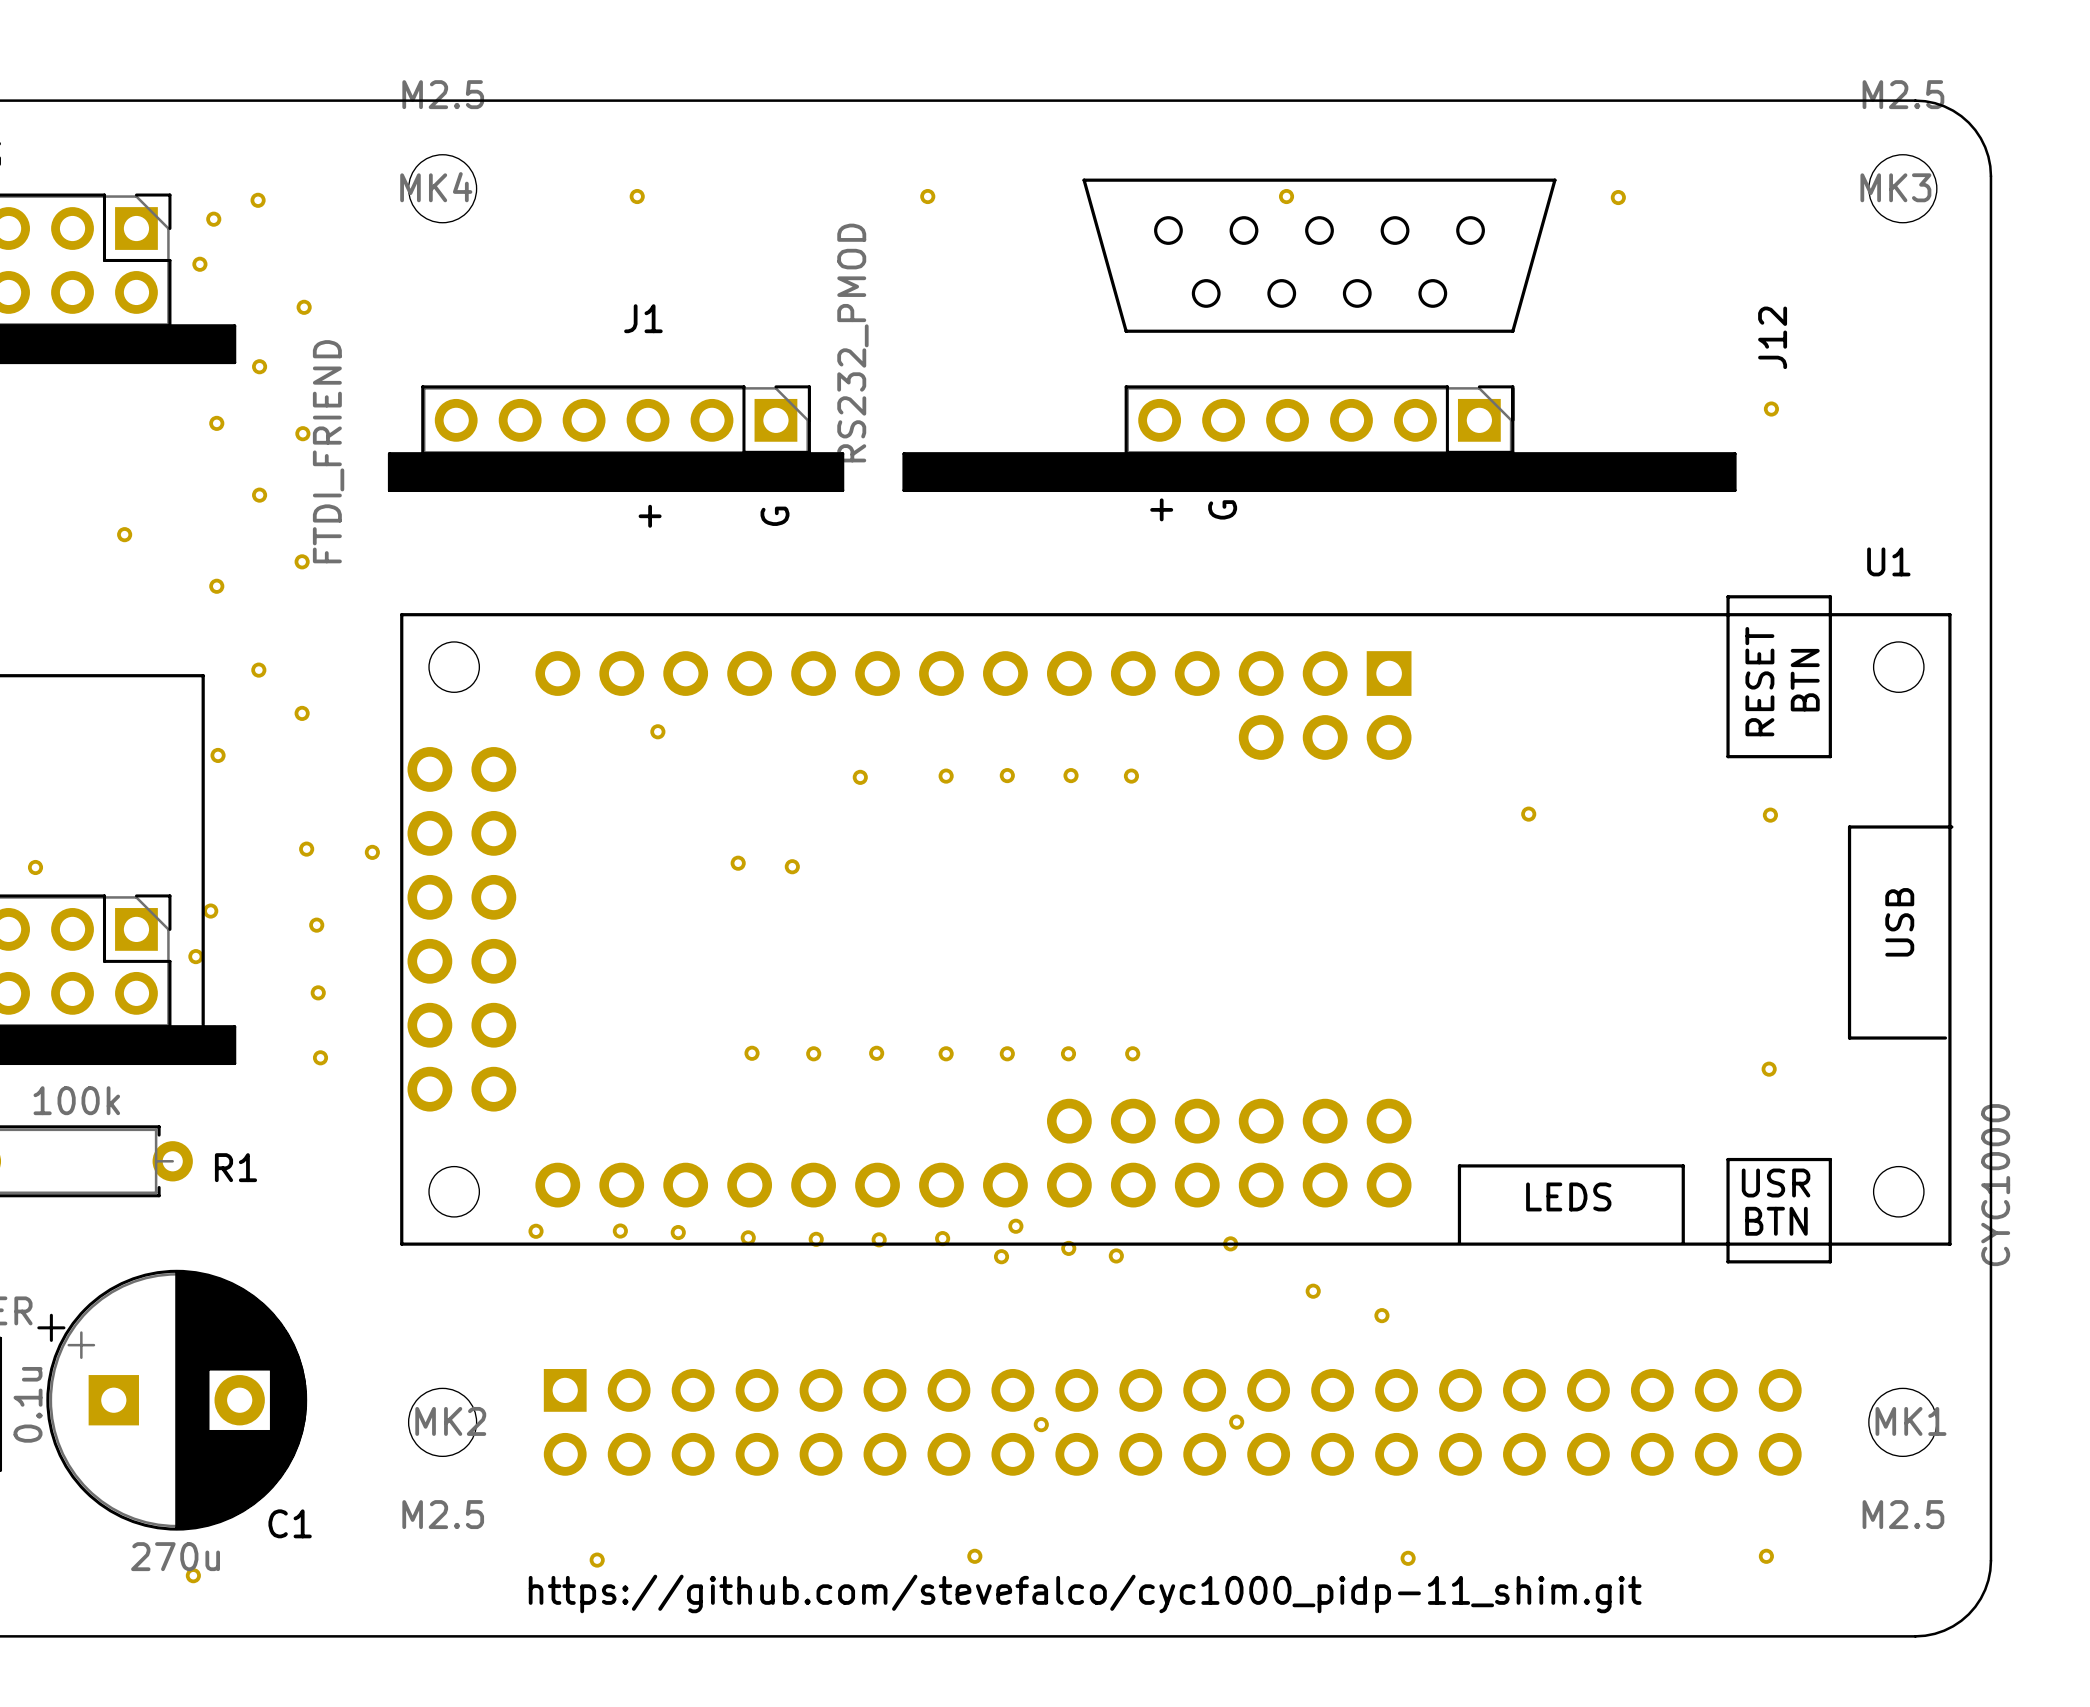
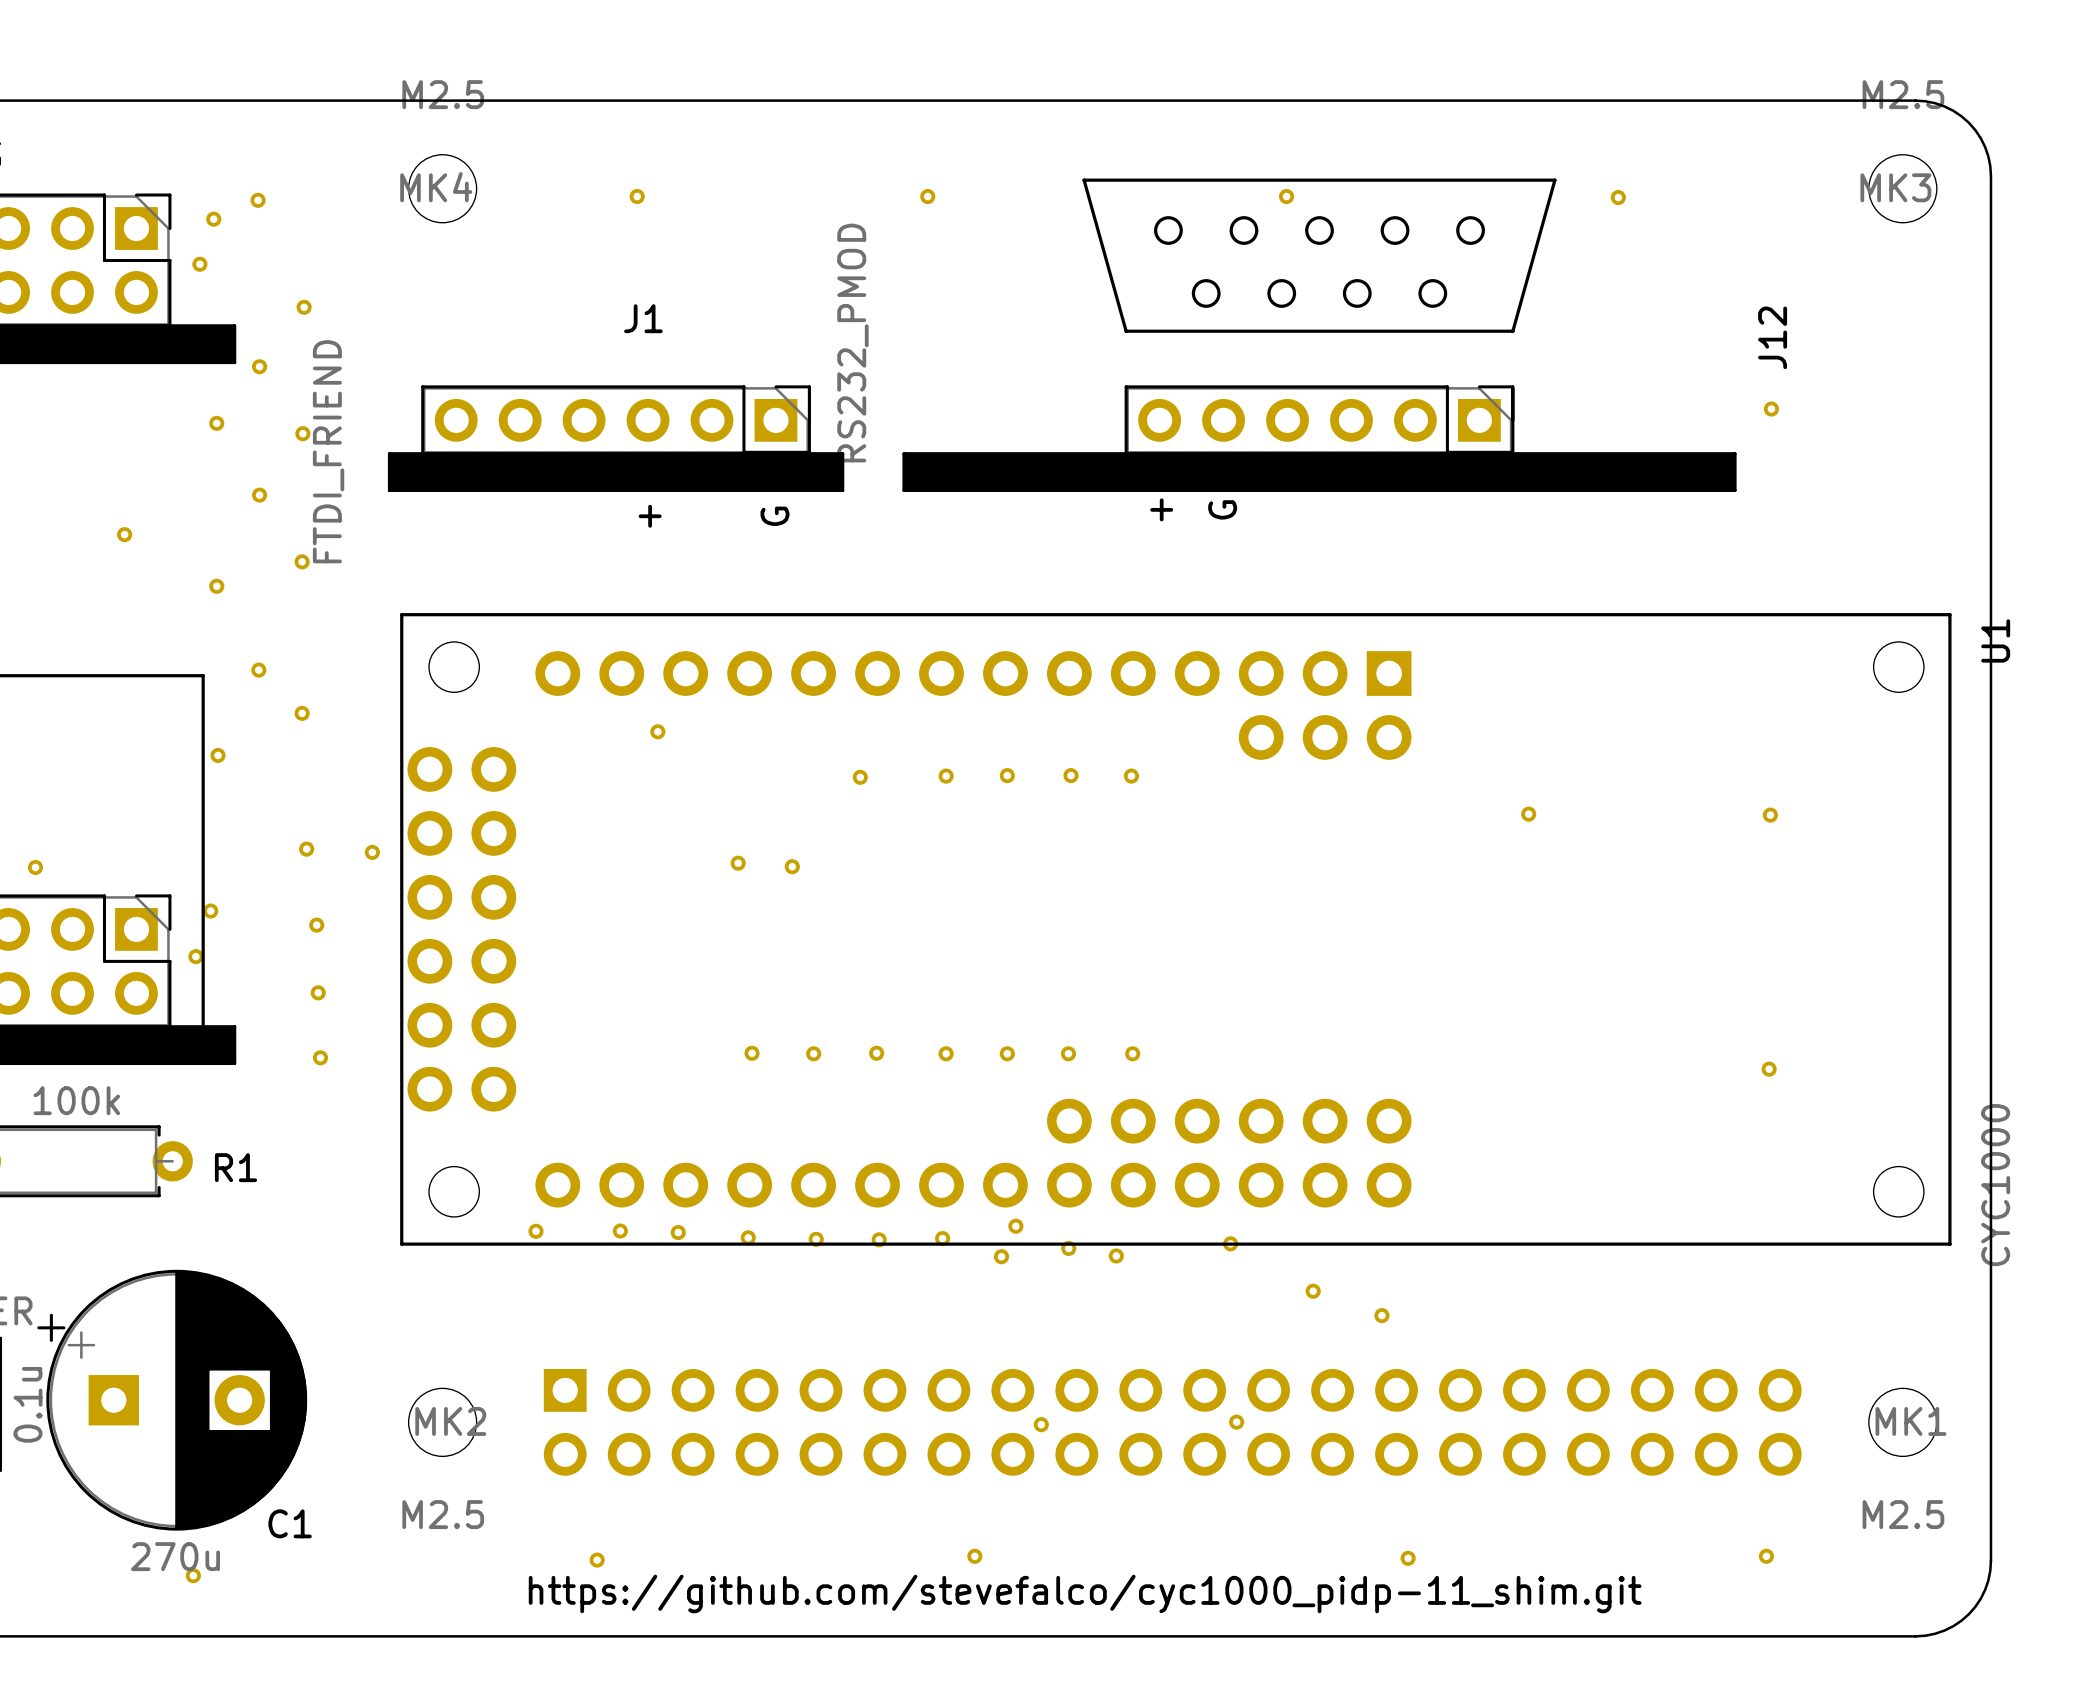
U1 name position: U1 (1888, 561) -> U1 (1995, 640)
U1 footprint: [400, 595, 1954, 1264] -> [400, 613, 1952, 1247]

